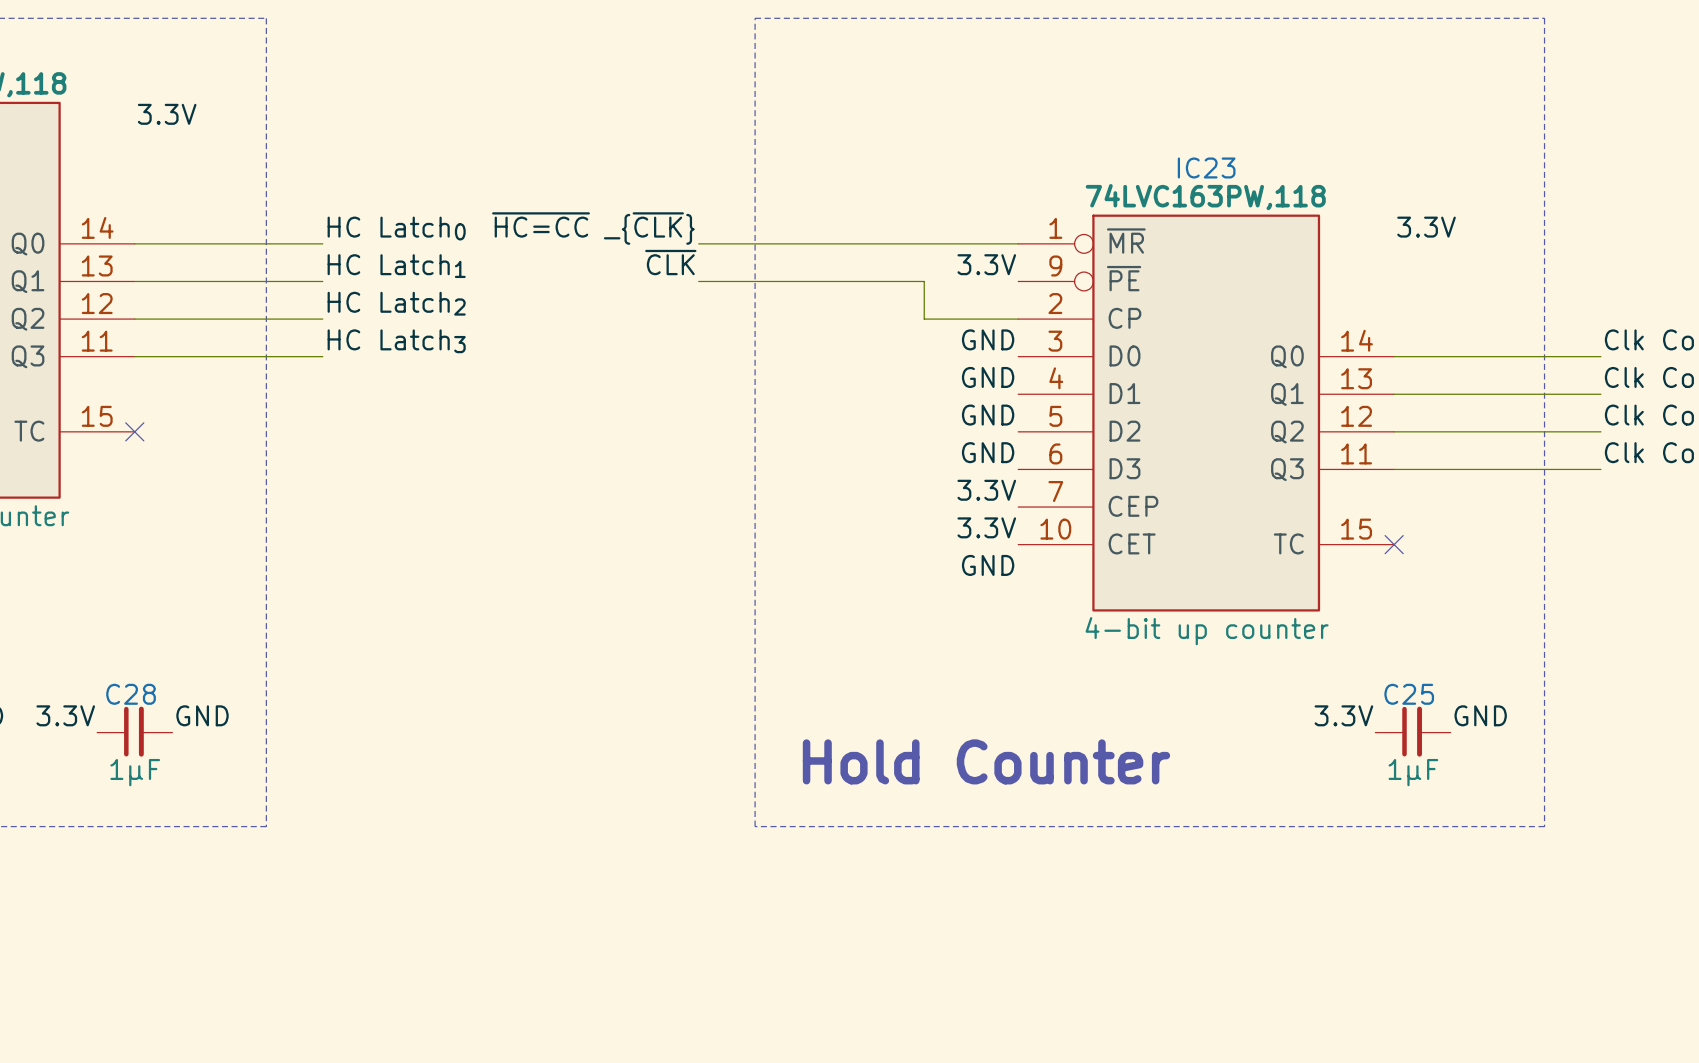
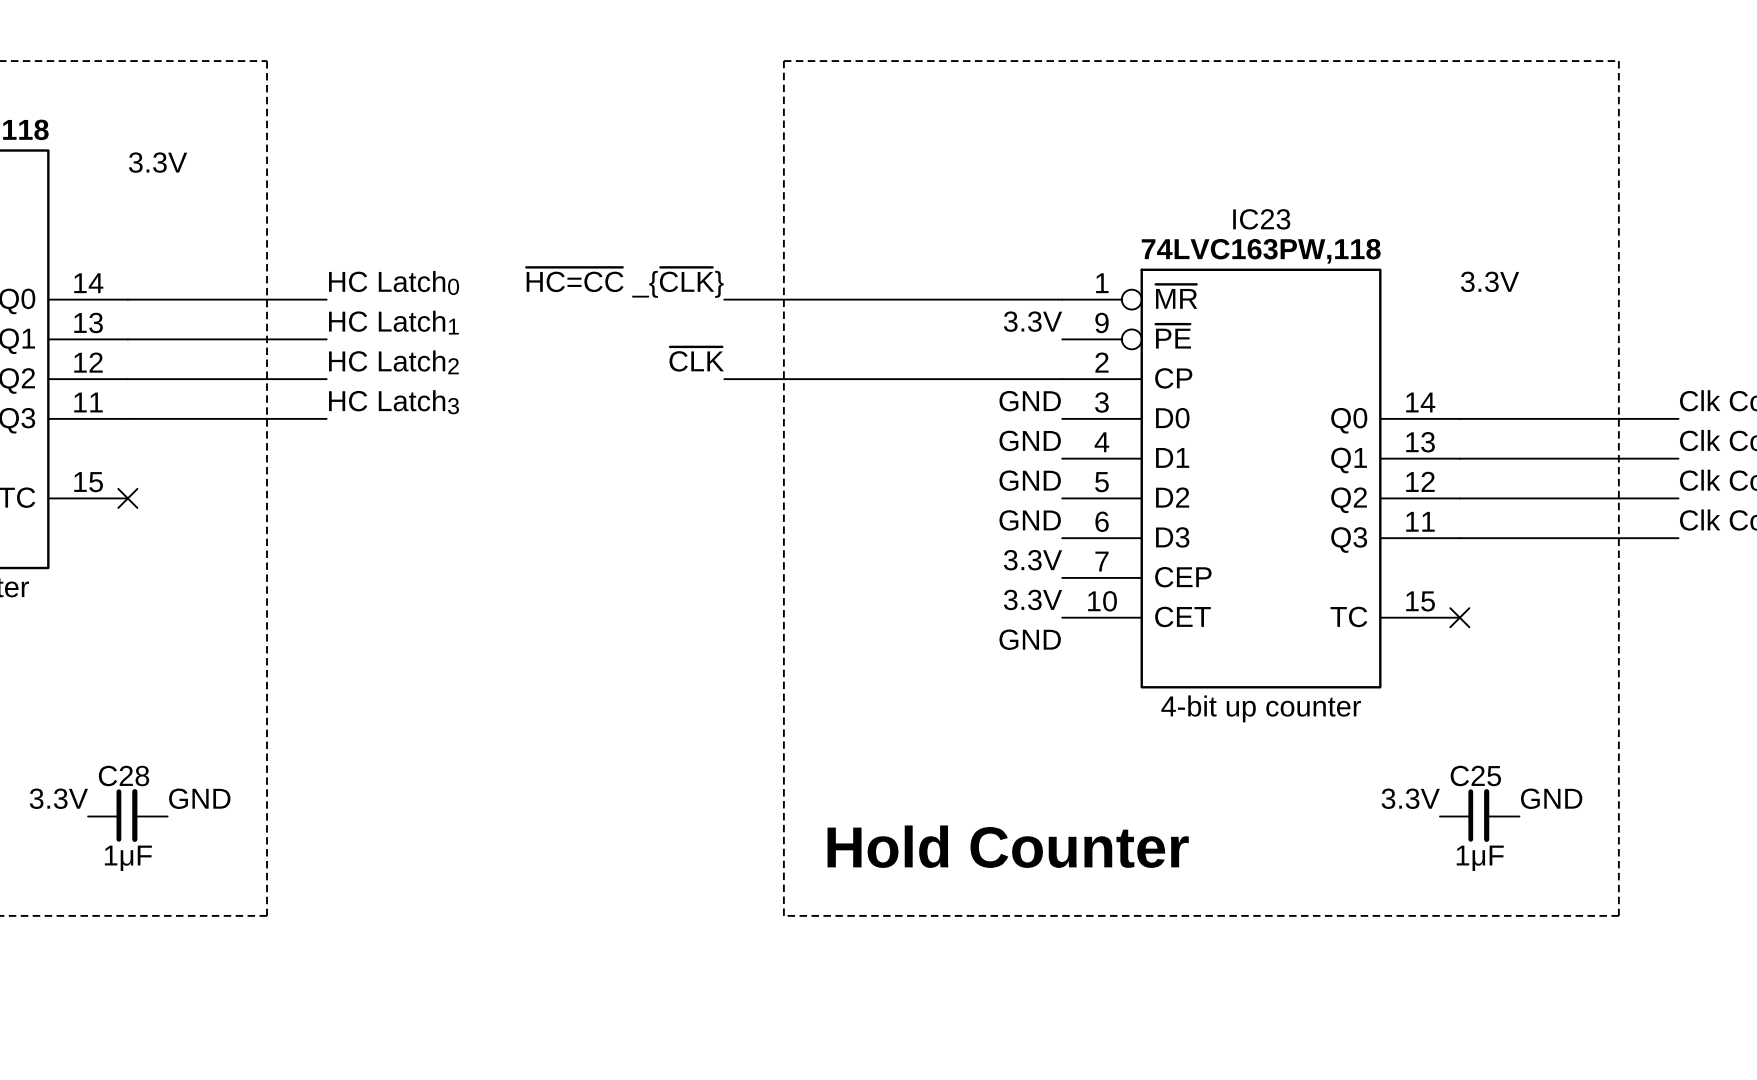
label position: ~{CLK} (670, 262) -> ~{CLK} (696, 359)
wire: (698, 281) (924, 281) (924, 319) -> (724, 379) (962, 379)

